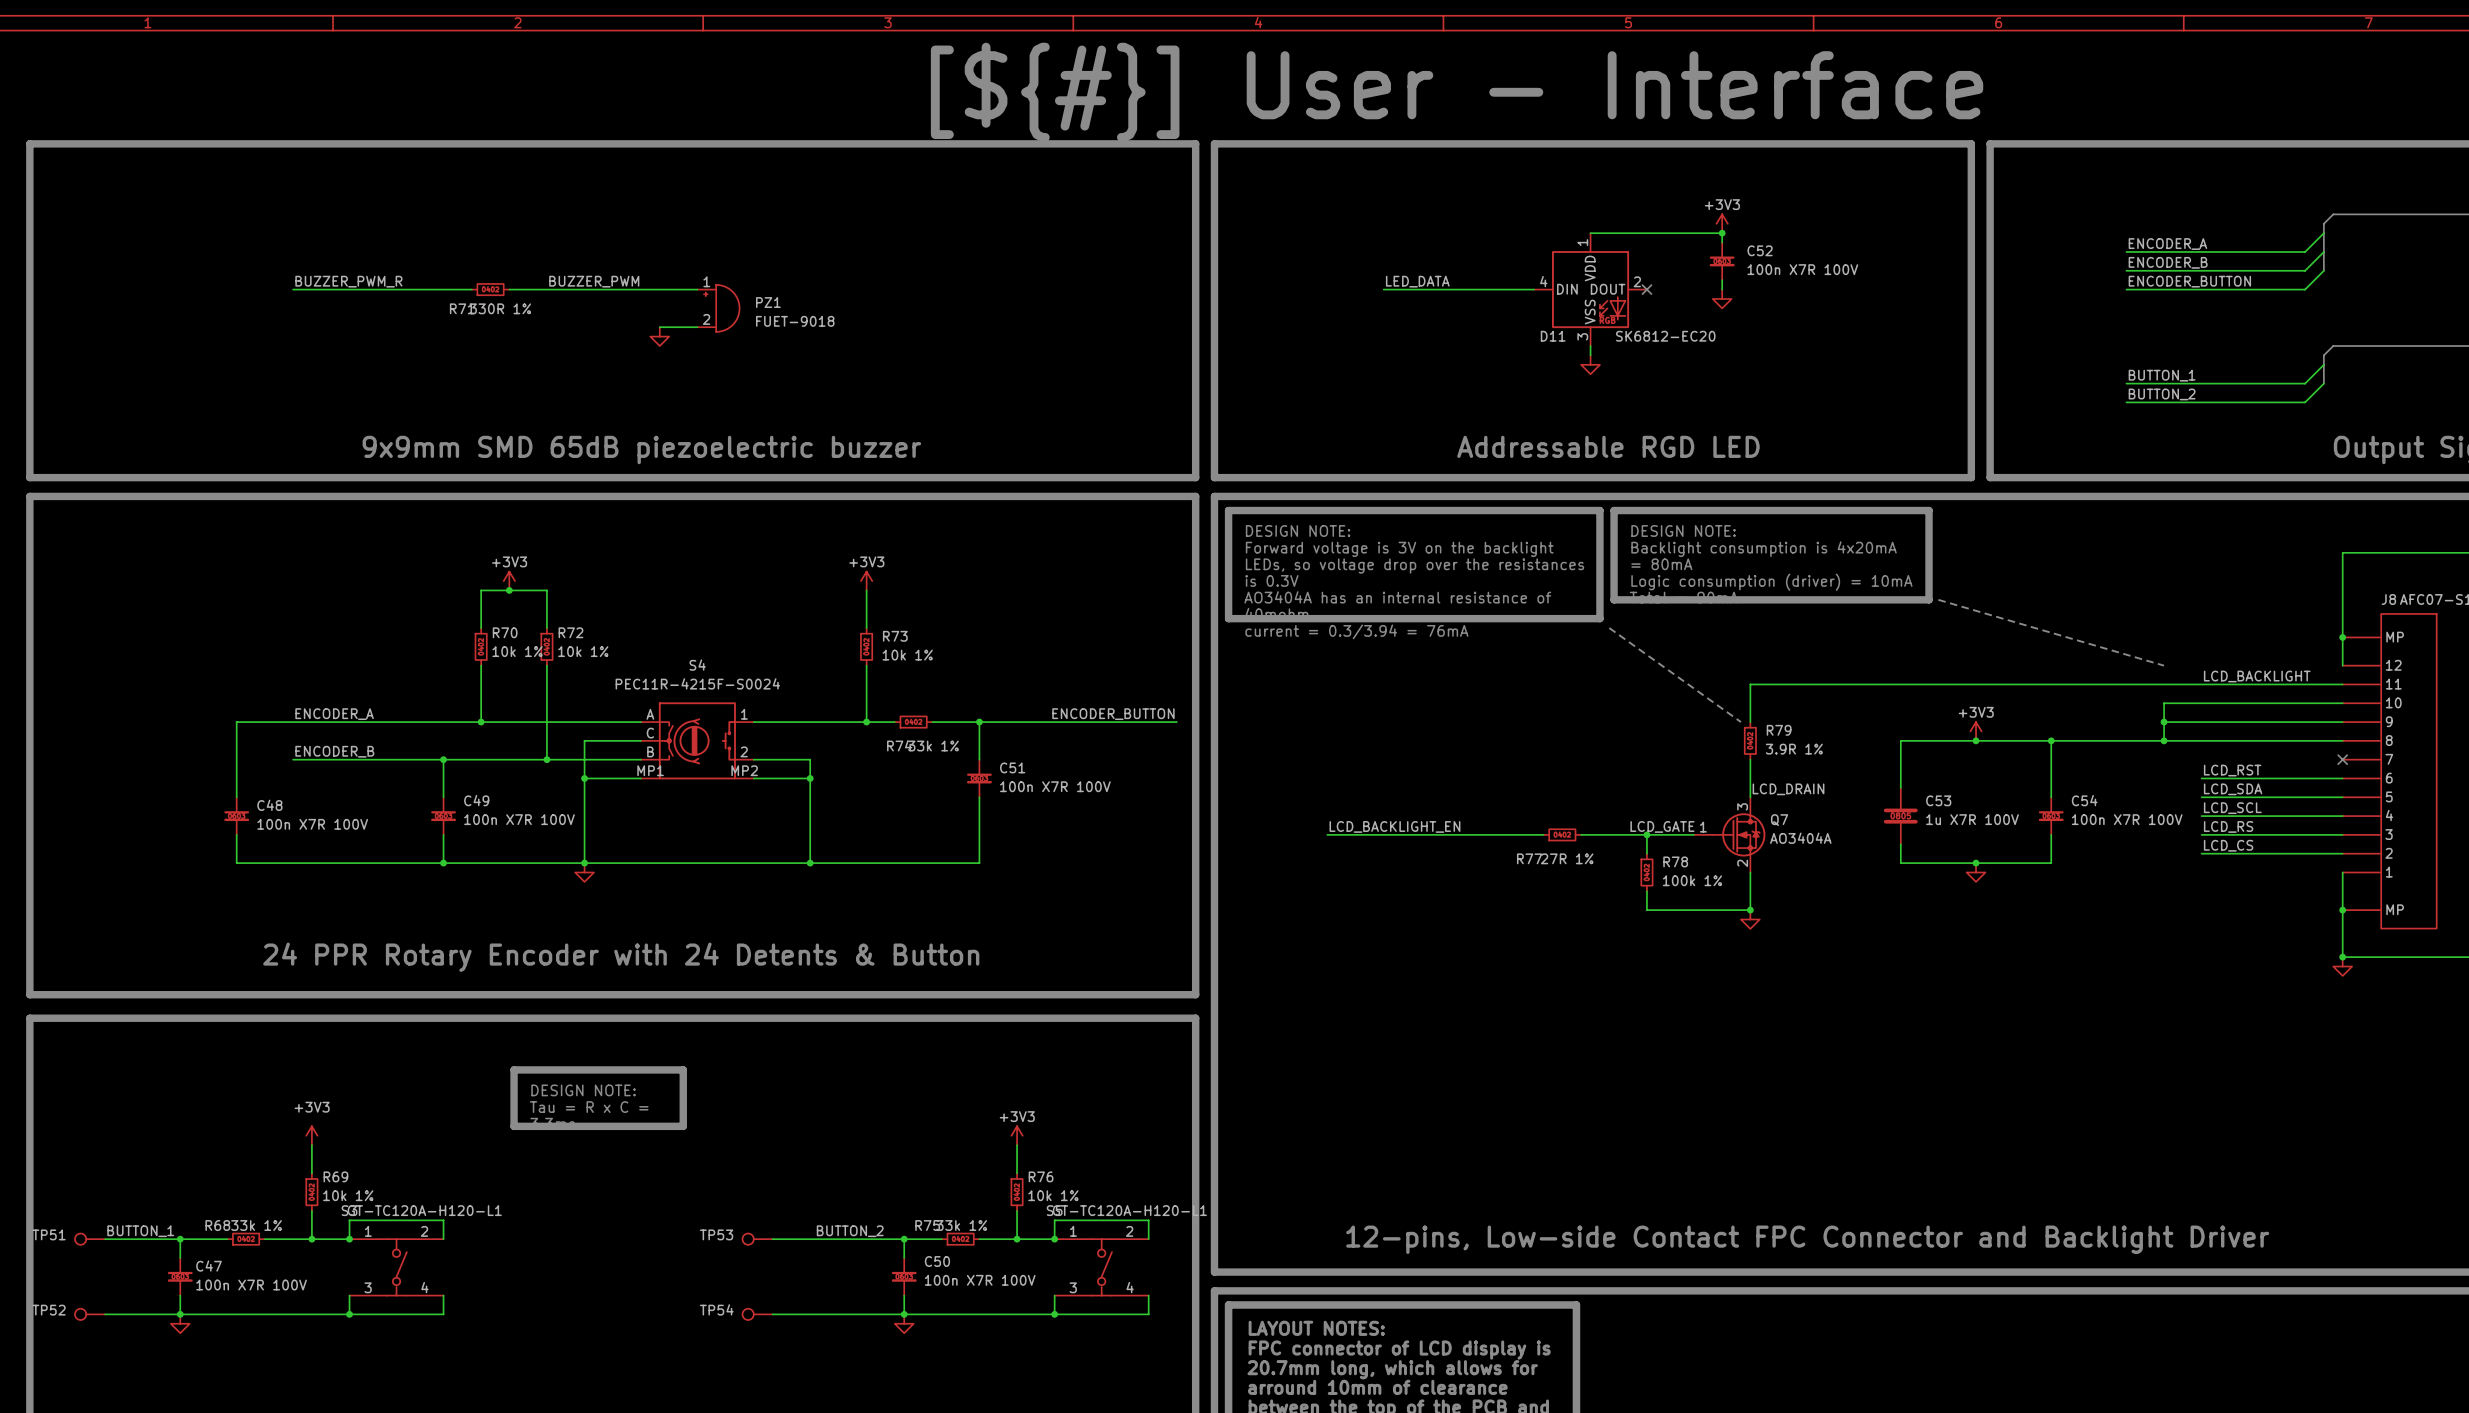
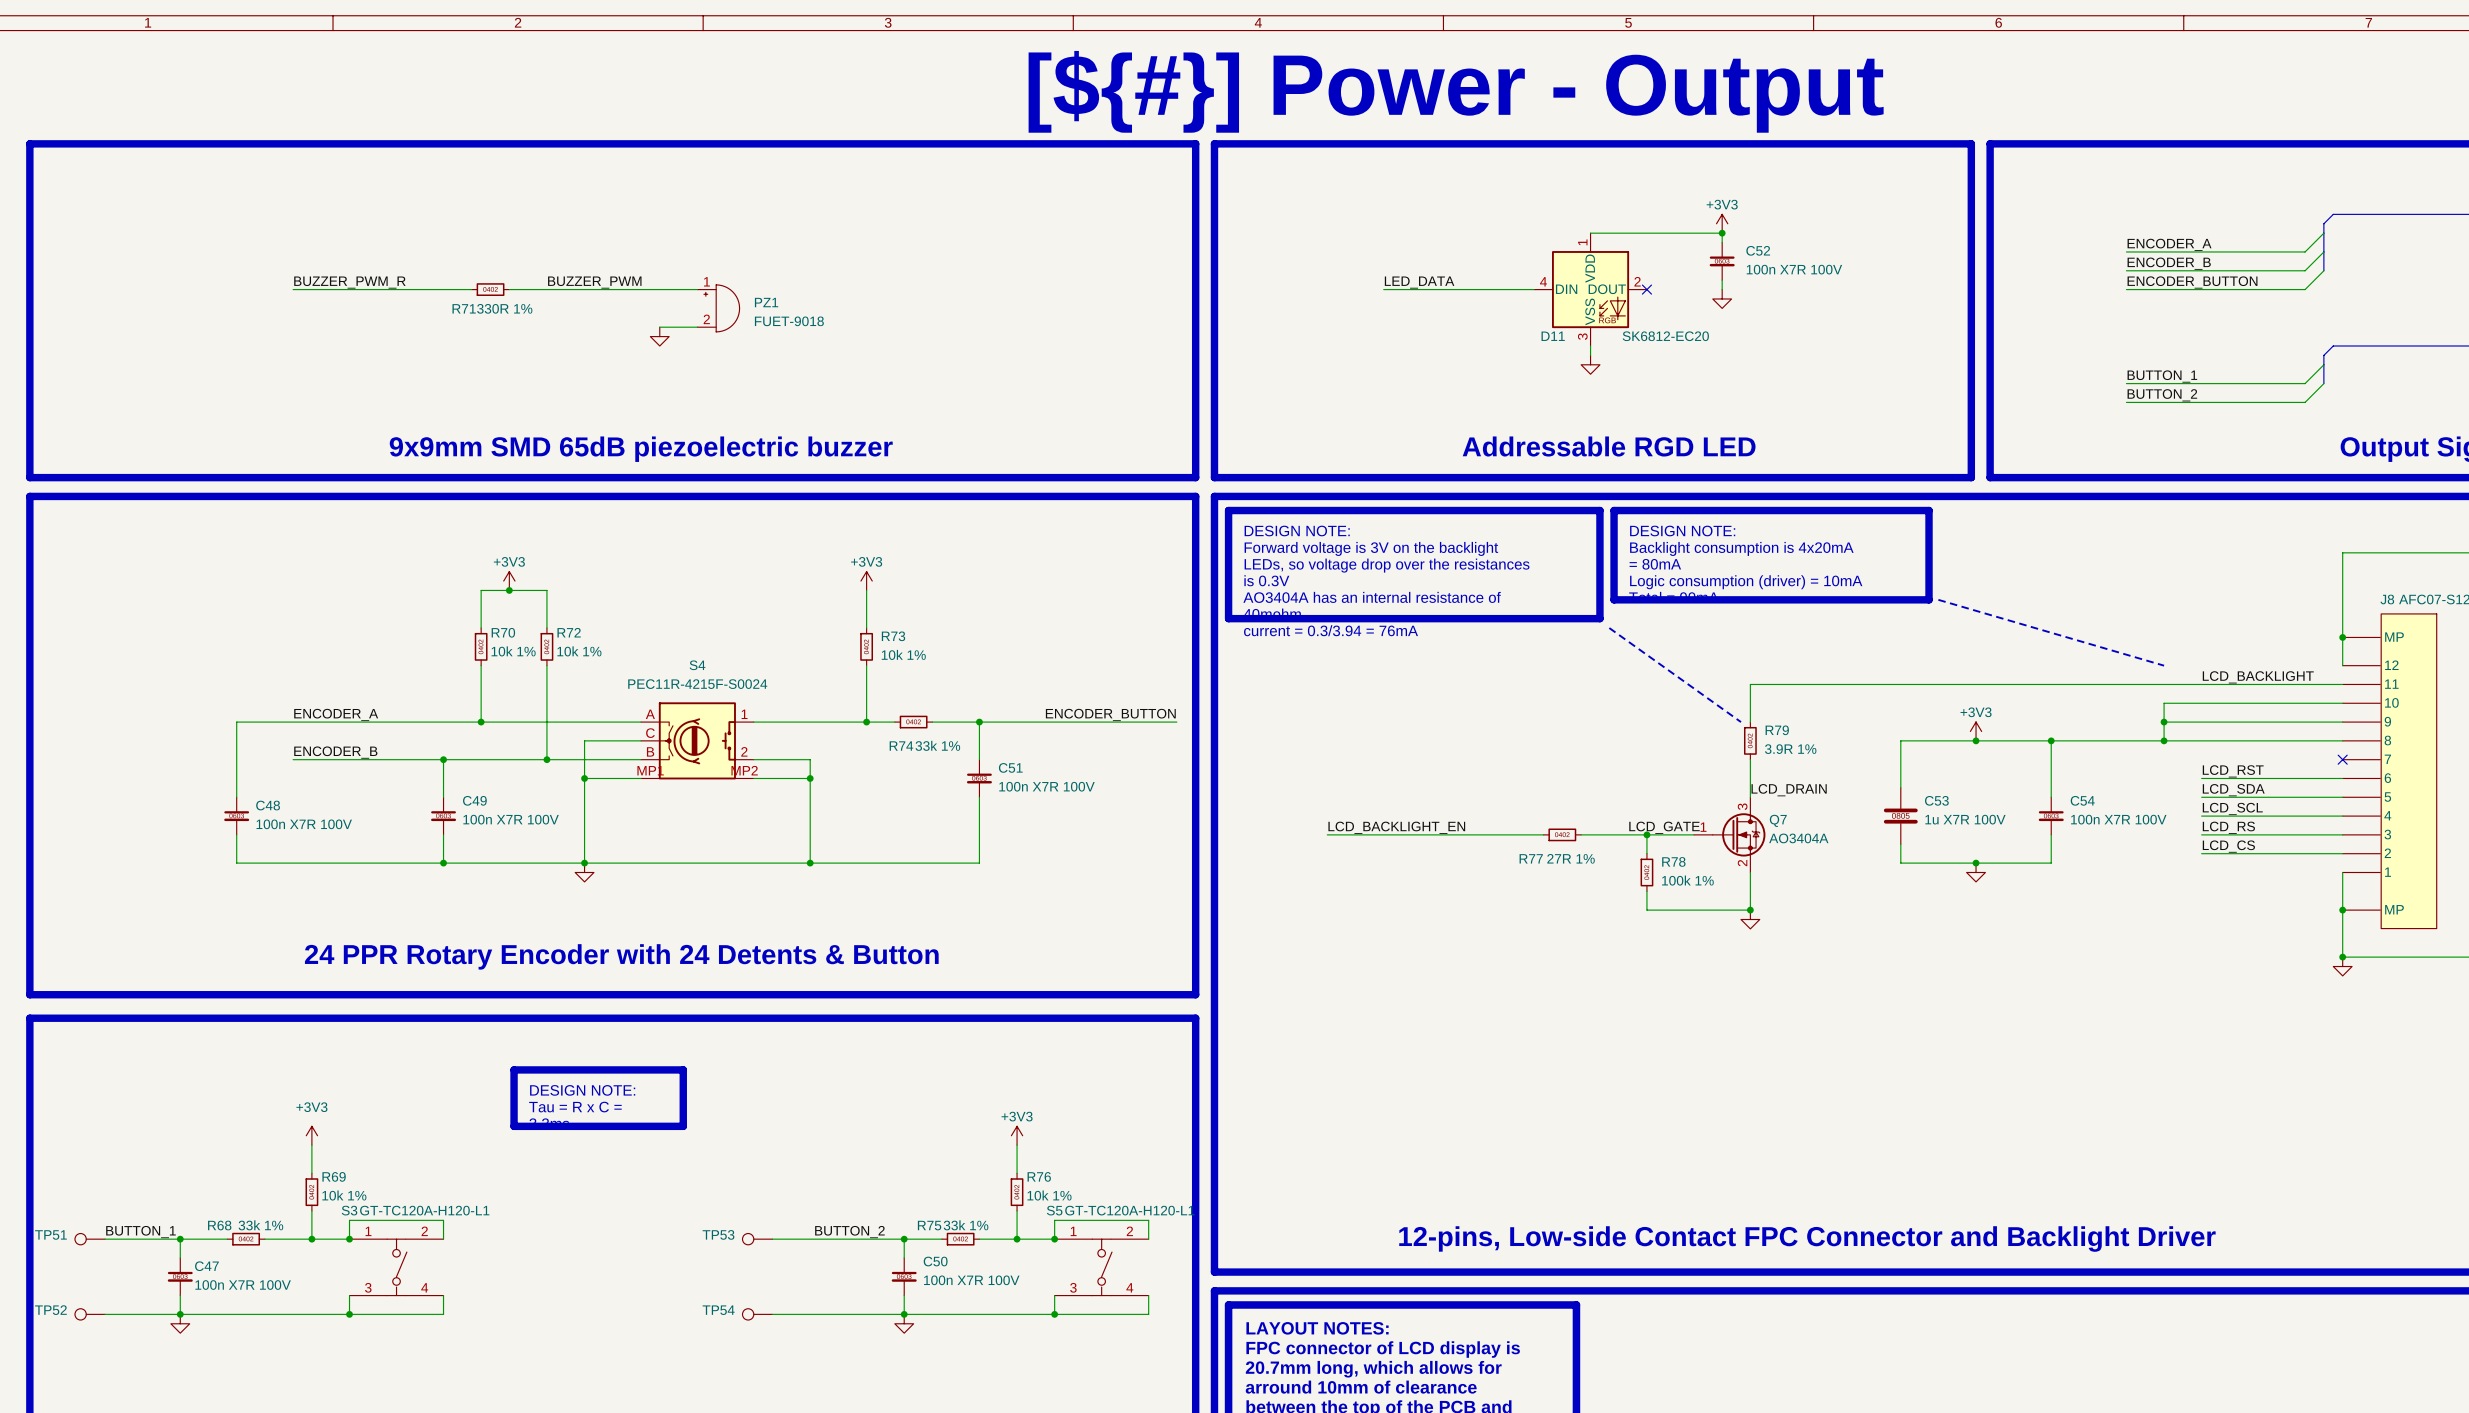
text: [${#}] User - Interface (1457, 92) -> [${#}] Power - Output (1456, 91)

